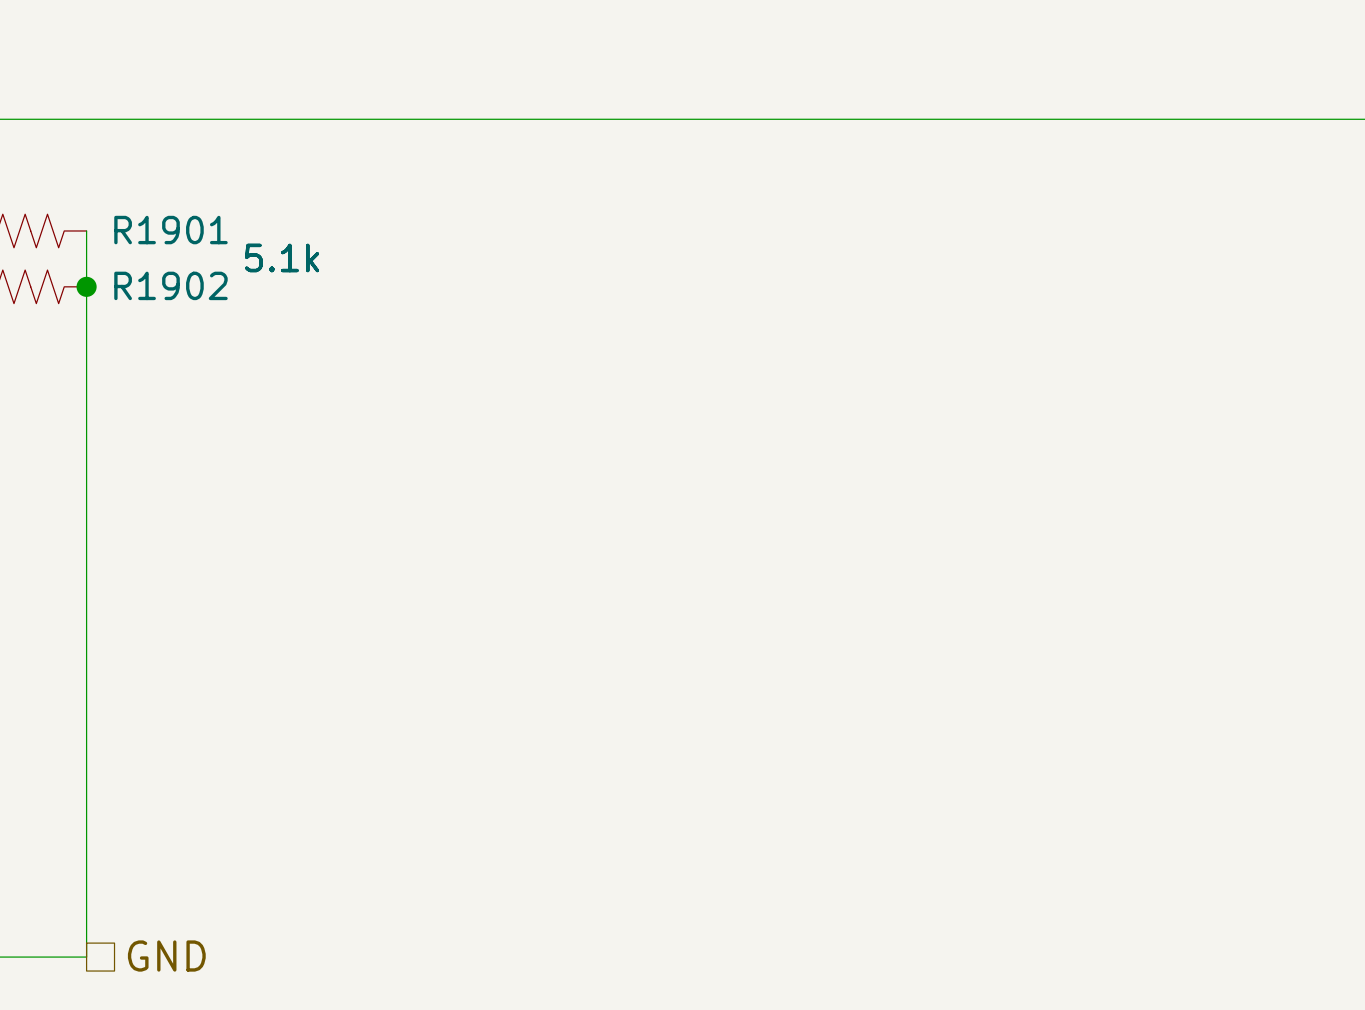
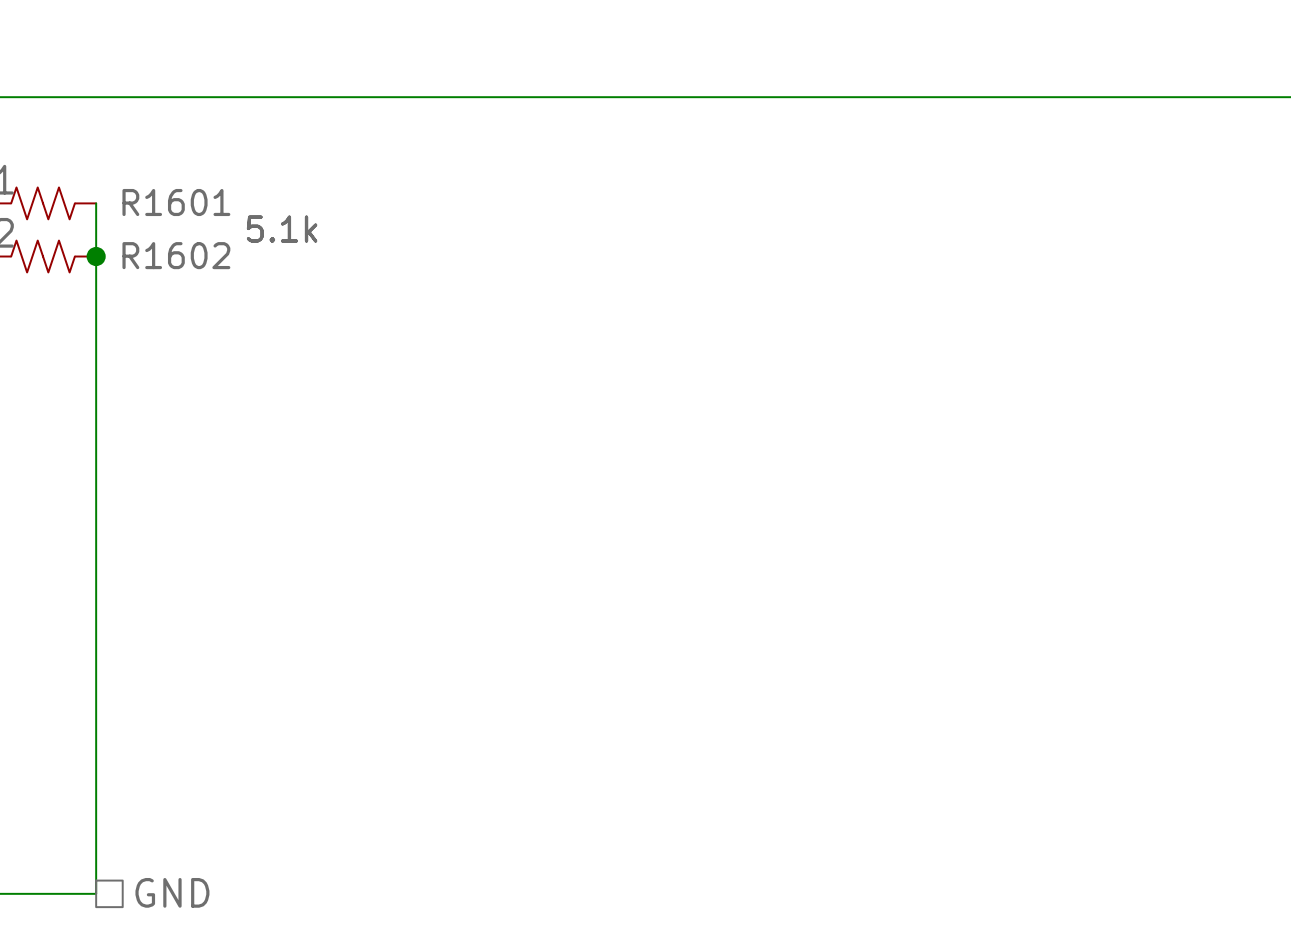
R1901 name: R1901 (170, 230) -> R1601 (176, 202)
R1902 name: R1902 (170, 285) -> R1602 (176, 255)

